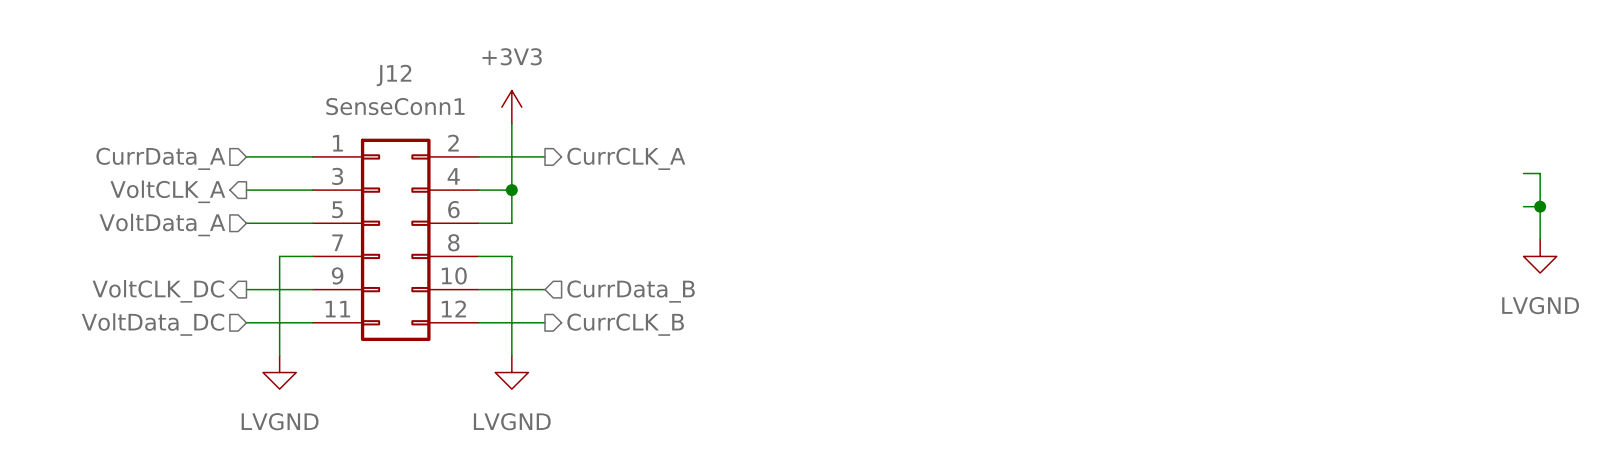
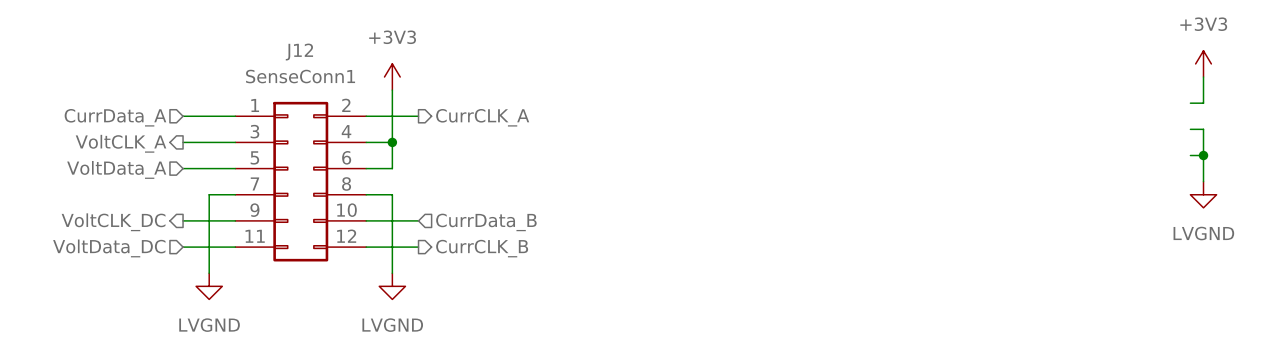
power symbol: none -> +3V3 (1203, 63)
wire: none -> (1203, 77) (1203, 103) (1190, 103)

